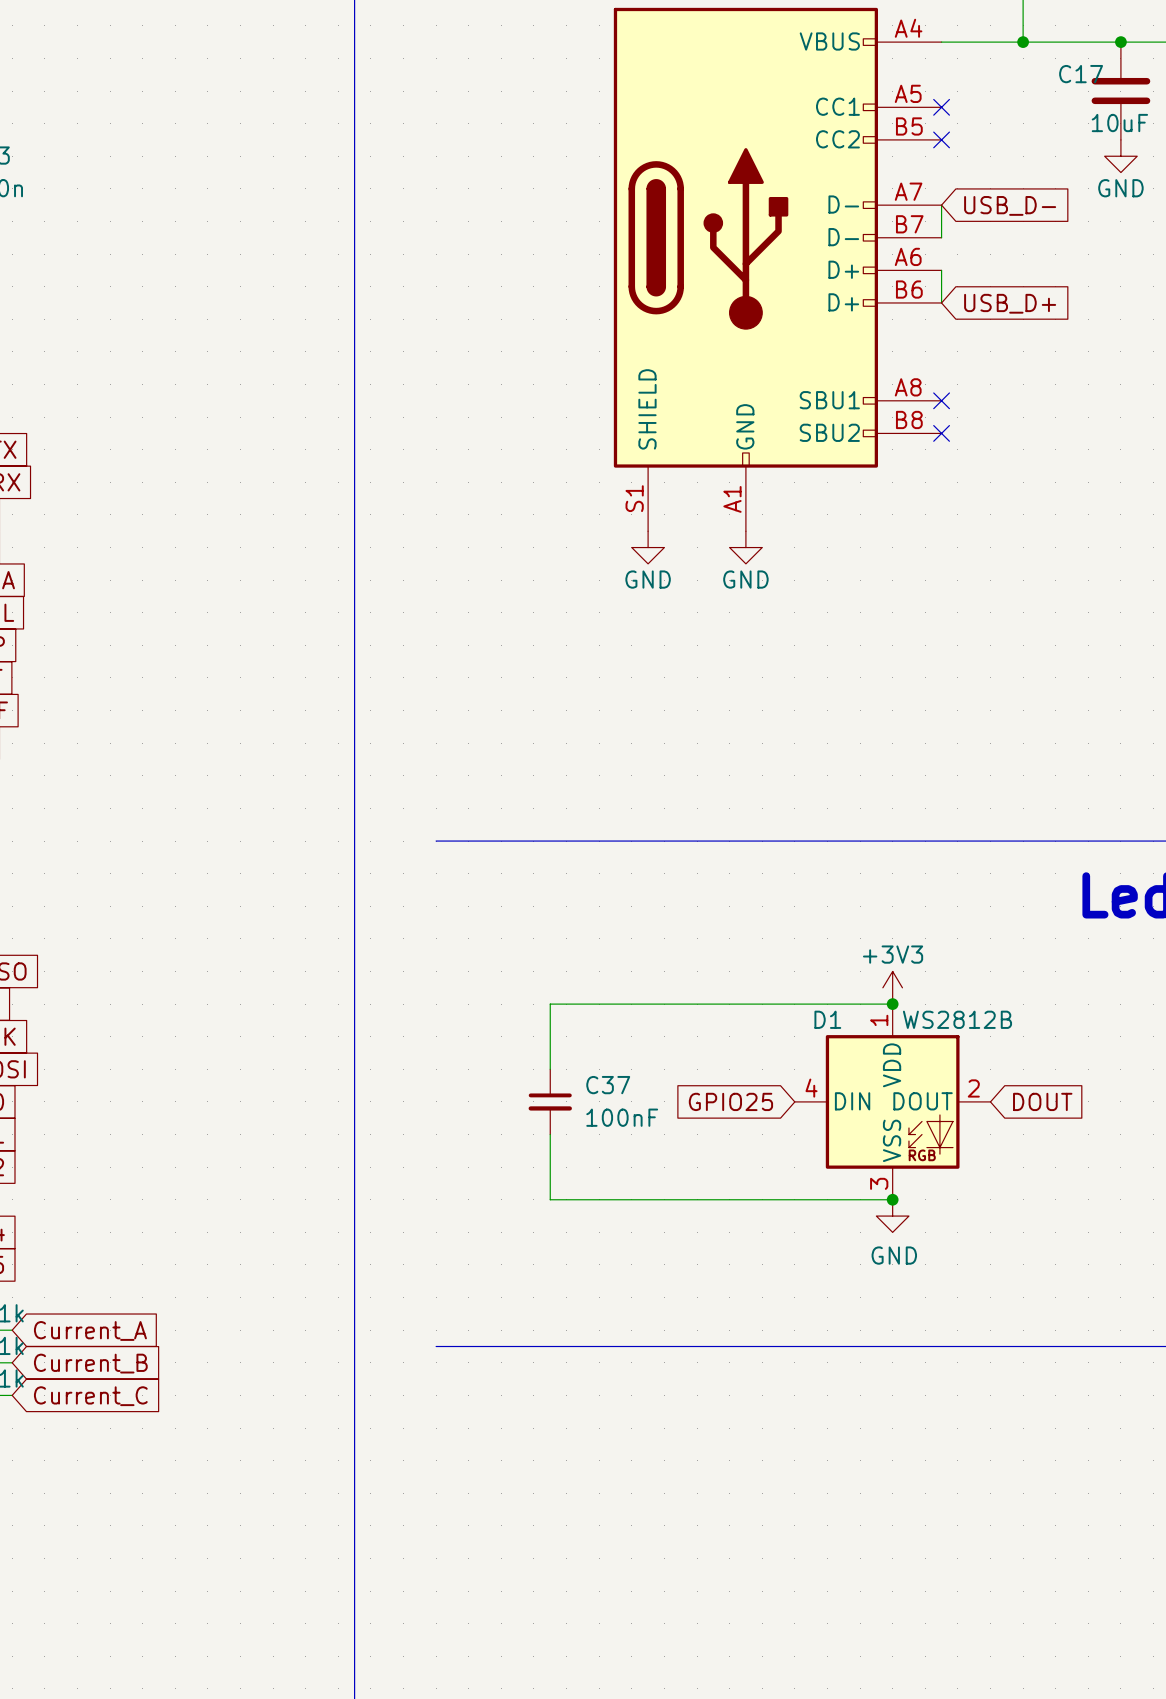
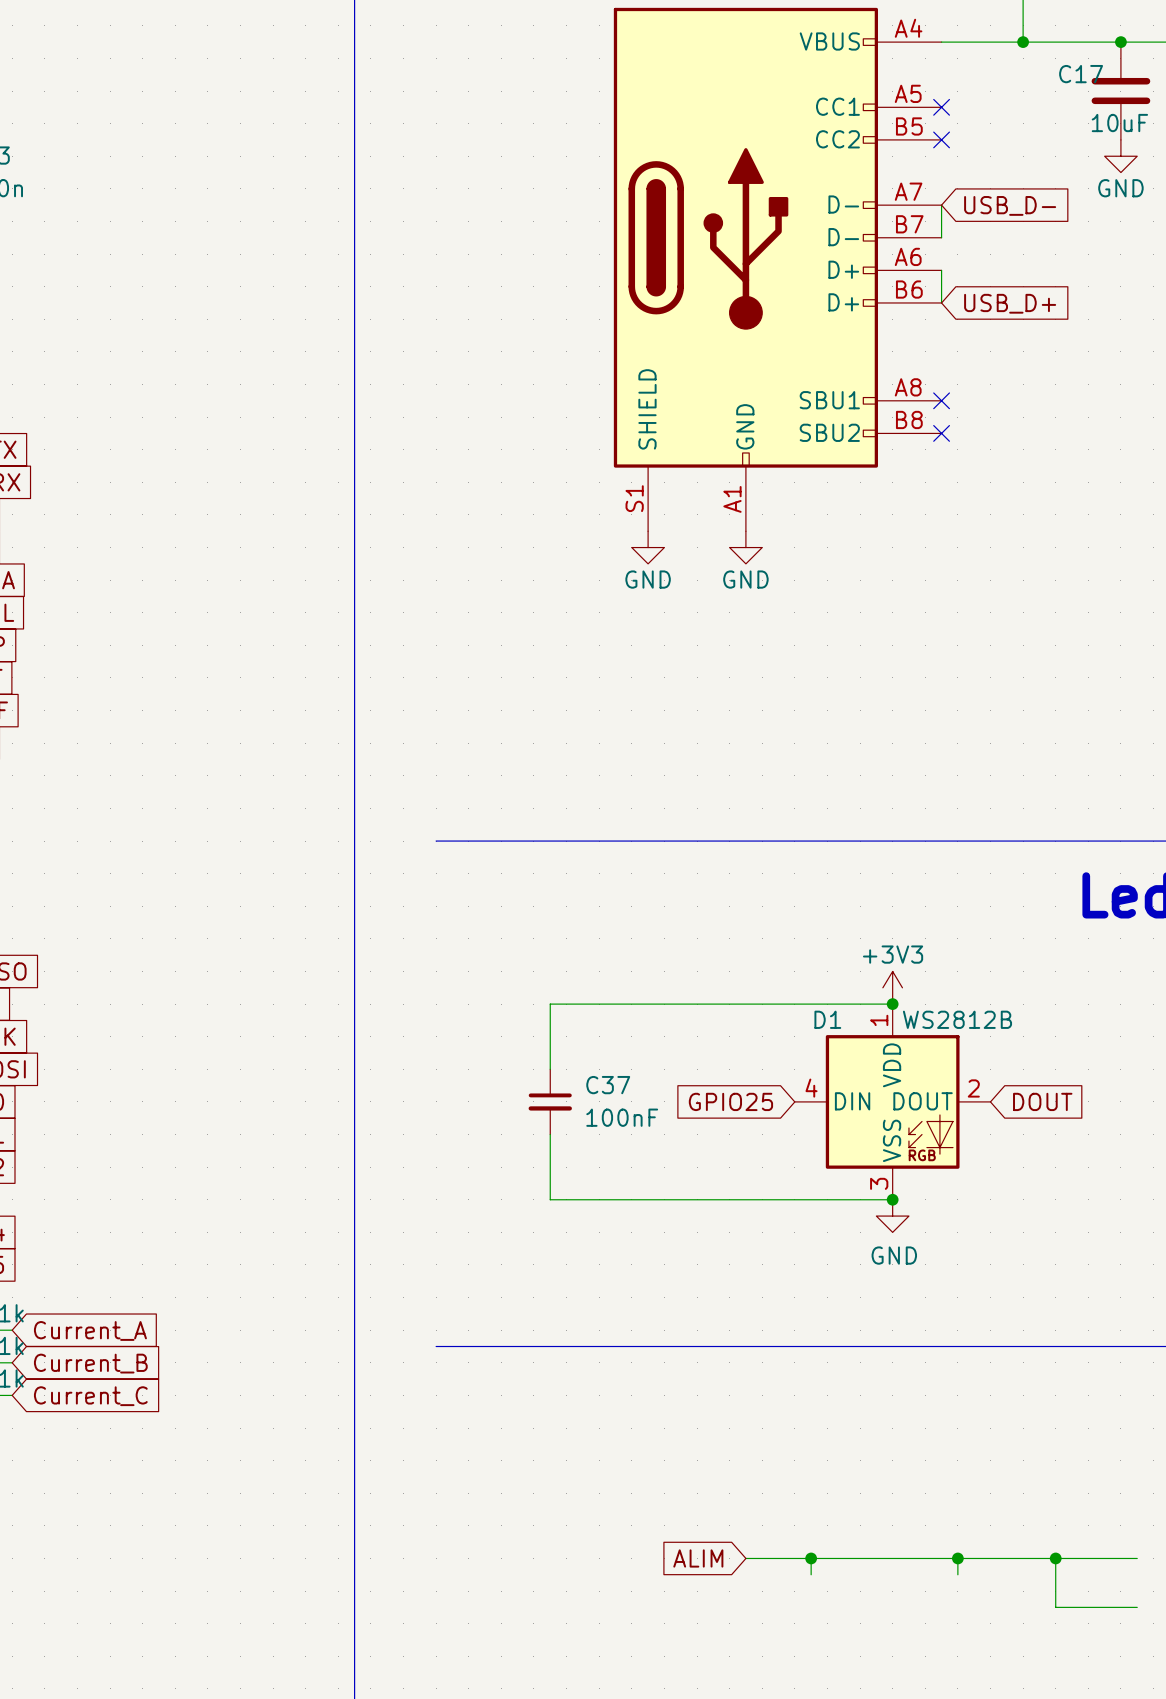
global label: none -> ALIM (698, 1558)
wire: none -> (745, 1558) (1137, 1558)
wire: none -> (811, 1558) (811, 1574)
junction: none -> (811, 1558)
wire: none -> (957, 1558) (957, 1574)
junction: none -> (957, 1558)
wire: none -> (1055, 1558) (1055, 1607) (1137, 1607)
junction: none -> (1055, 1558)

